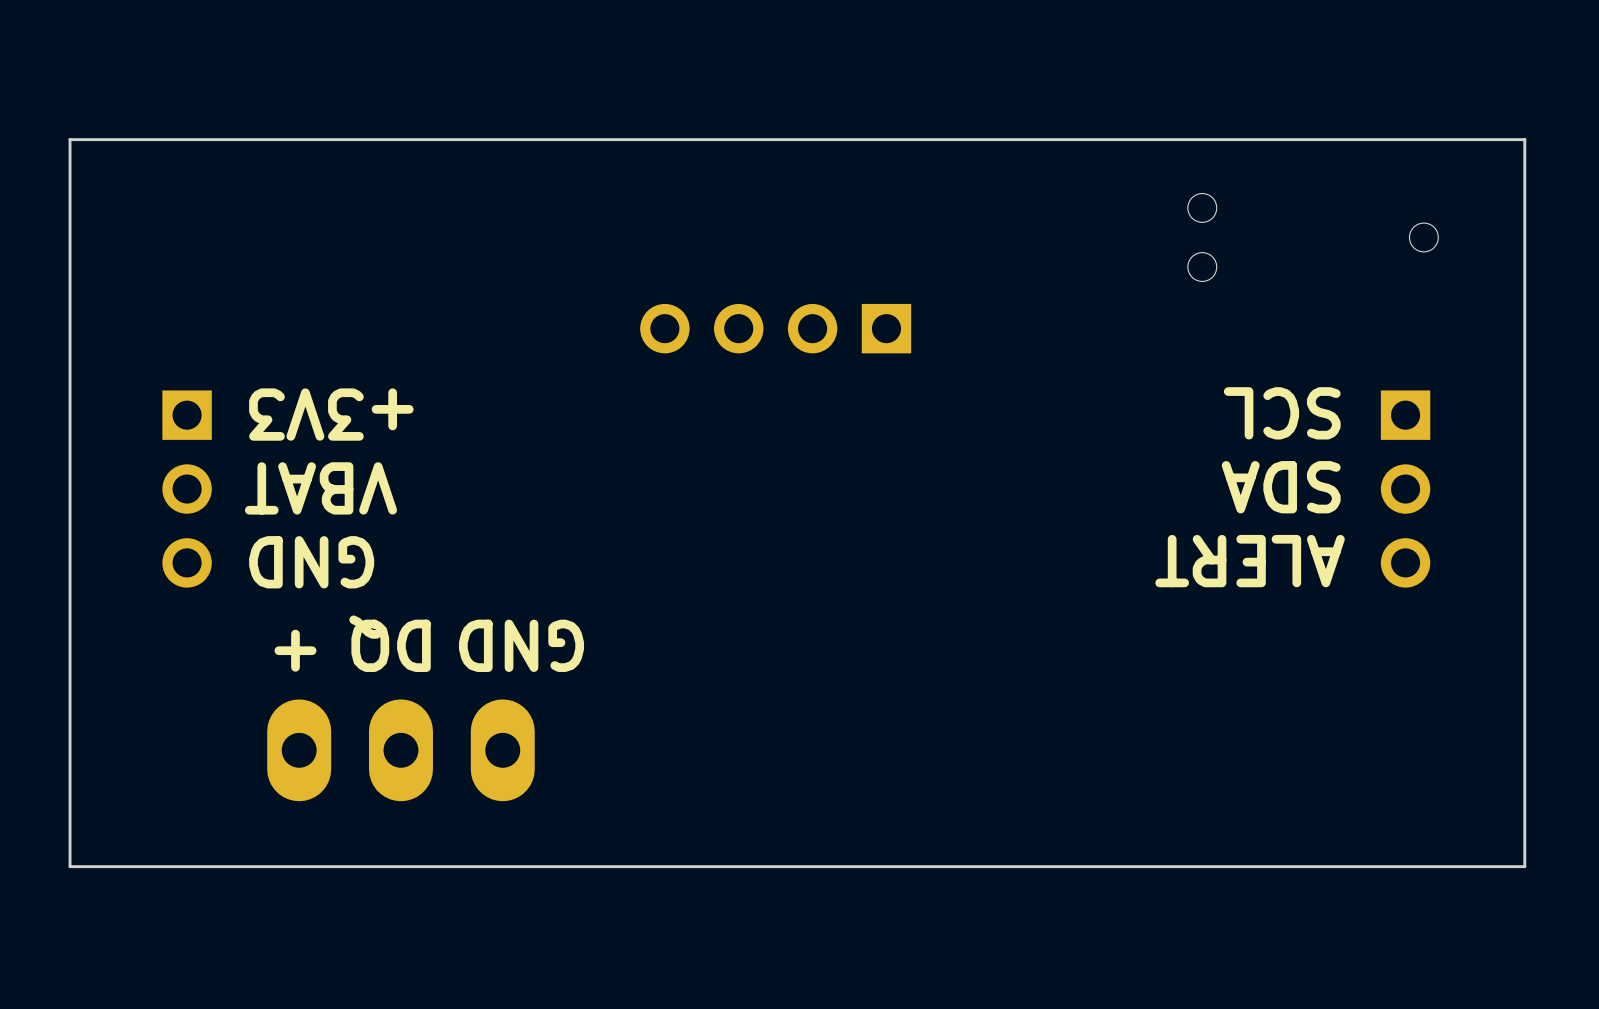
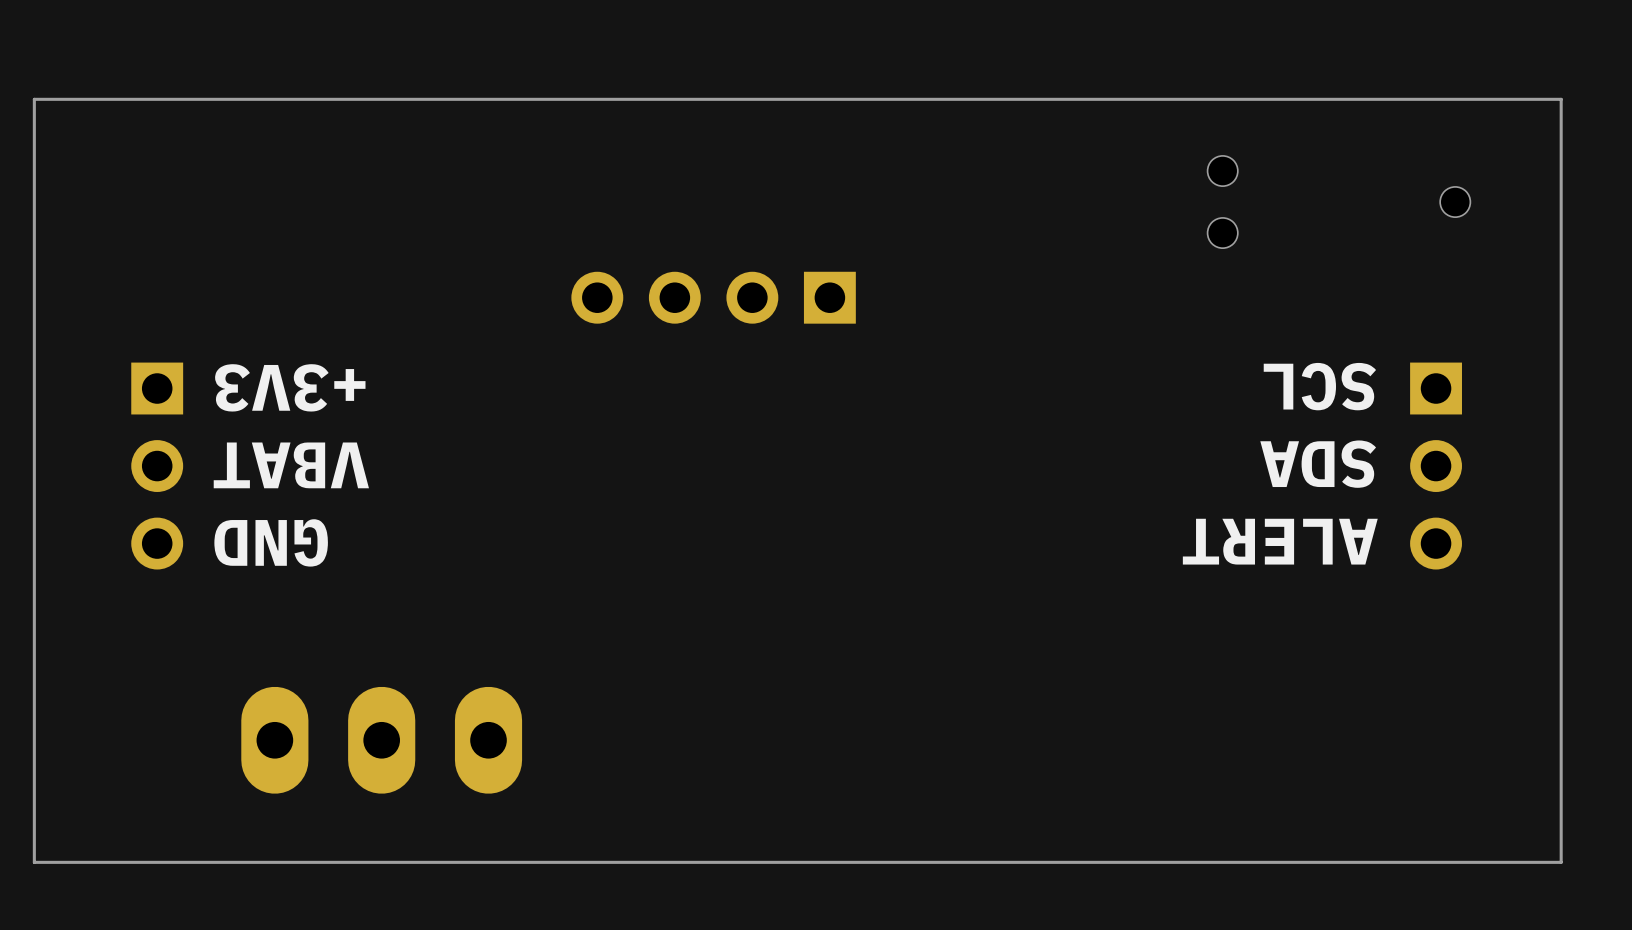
part position: (775, 328) -> (713, 297)
text: DQ (390, 643) -> none
text: GND (521, 645) -> none
text: + (295, 650) -> none

